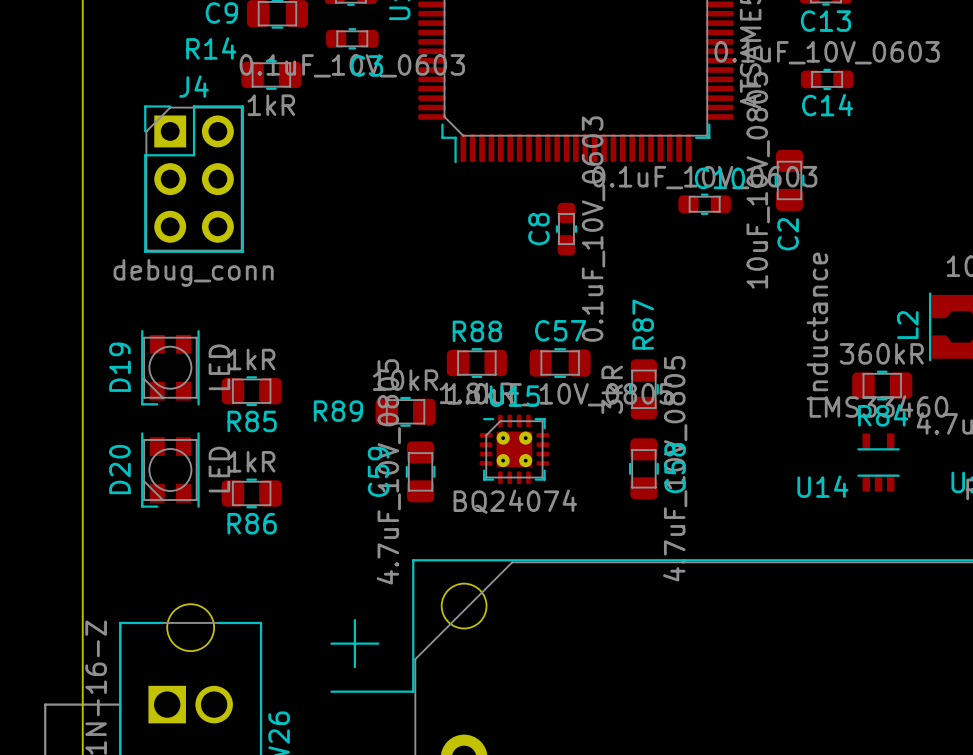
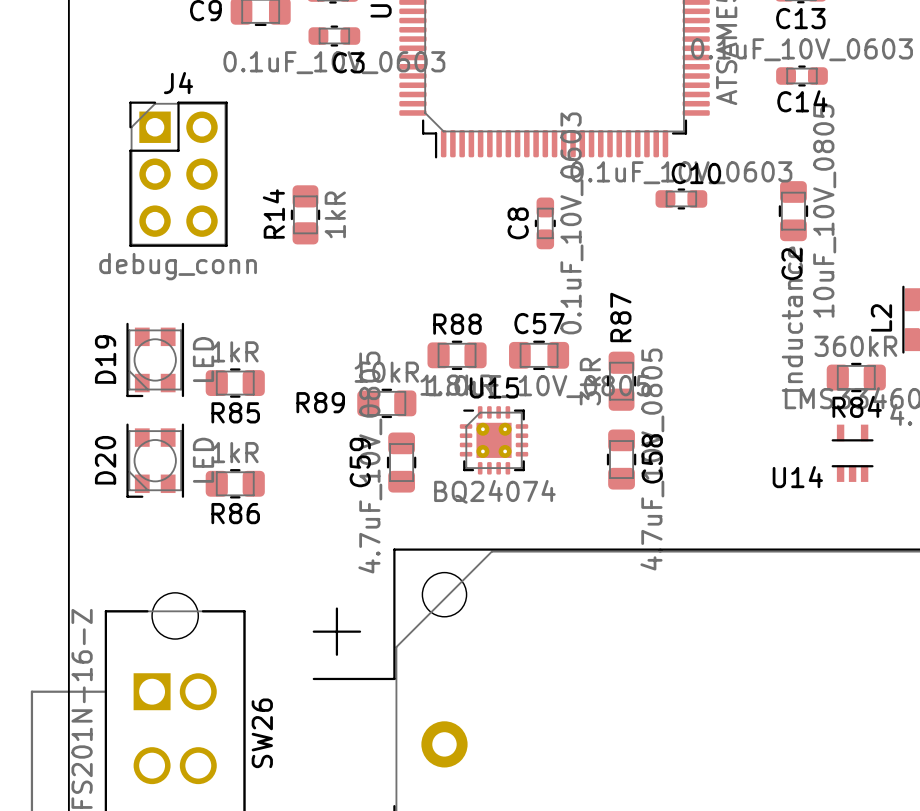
R14 name position: R14 (211, 48) -> R14 (273, 213)
R14 rotation: 0° (271, 74) -> 90° clockwise (305, 214)
R14 position: (271, 74) -> (305, 214)
R14 value position: 1kR (271, 105) -> 1kR (335, 214)
C2 value position: 10uF_10V_0805 (758, 180) -> 10uF_10V_0805 (824, 211)
C2 position: (789, 180) -> (793, 211)

